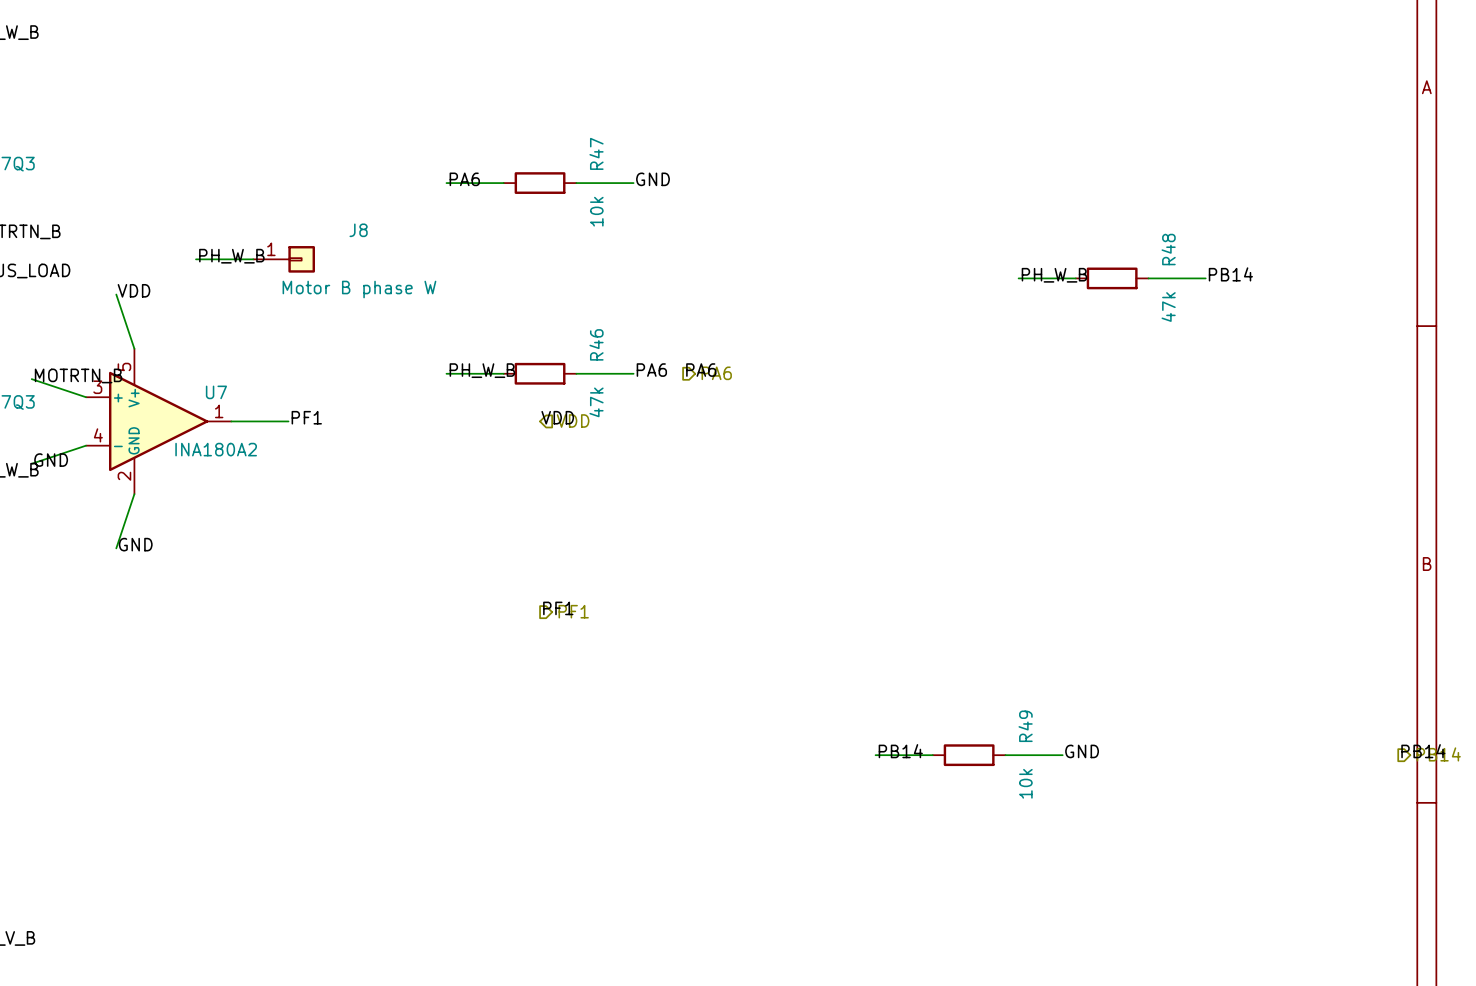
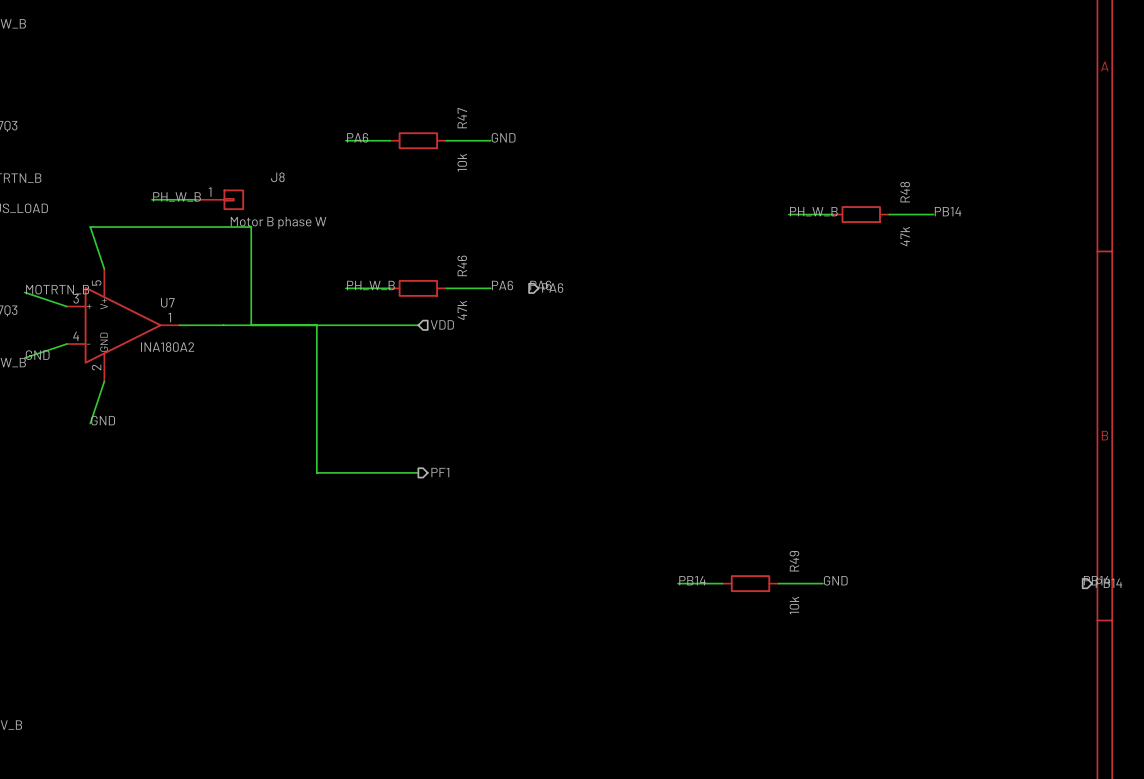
label: VDD (133, 290) -> none
wire: none -> (90, 227) (251, 227) (251, 325)
label: PF1 (306, 417) -> none
label: VDD (557, 417) -> none
wire: none -> (223, 325) (418, 325)
wire: none -> (316, 325) (316, 472) (418, 472)
label: PF1 (558, 608) -> none

